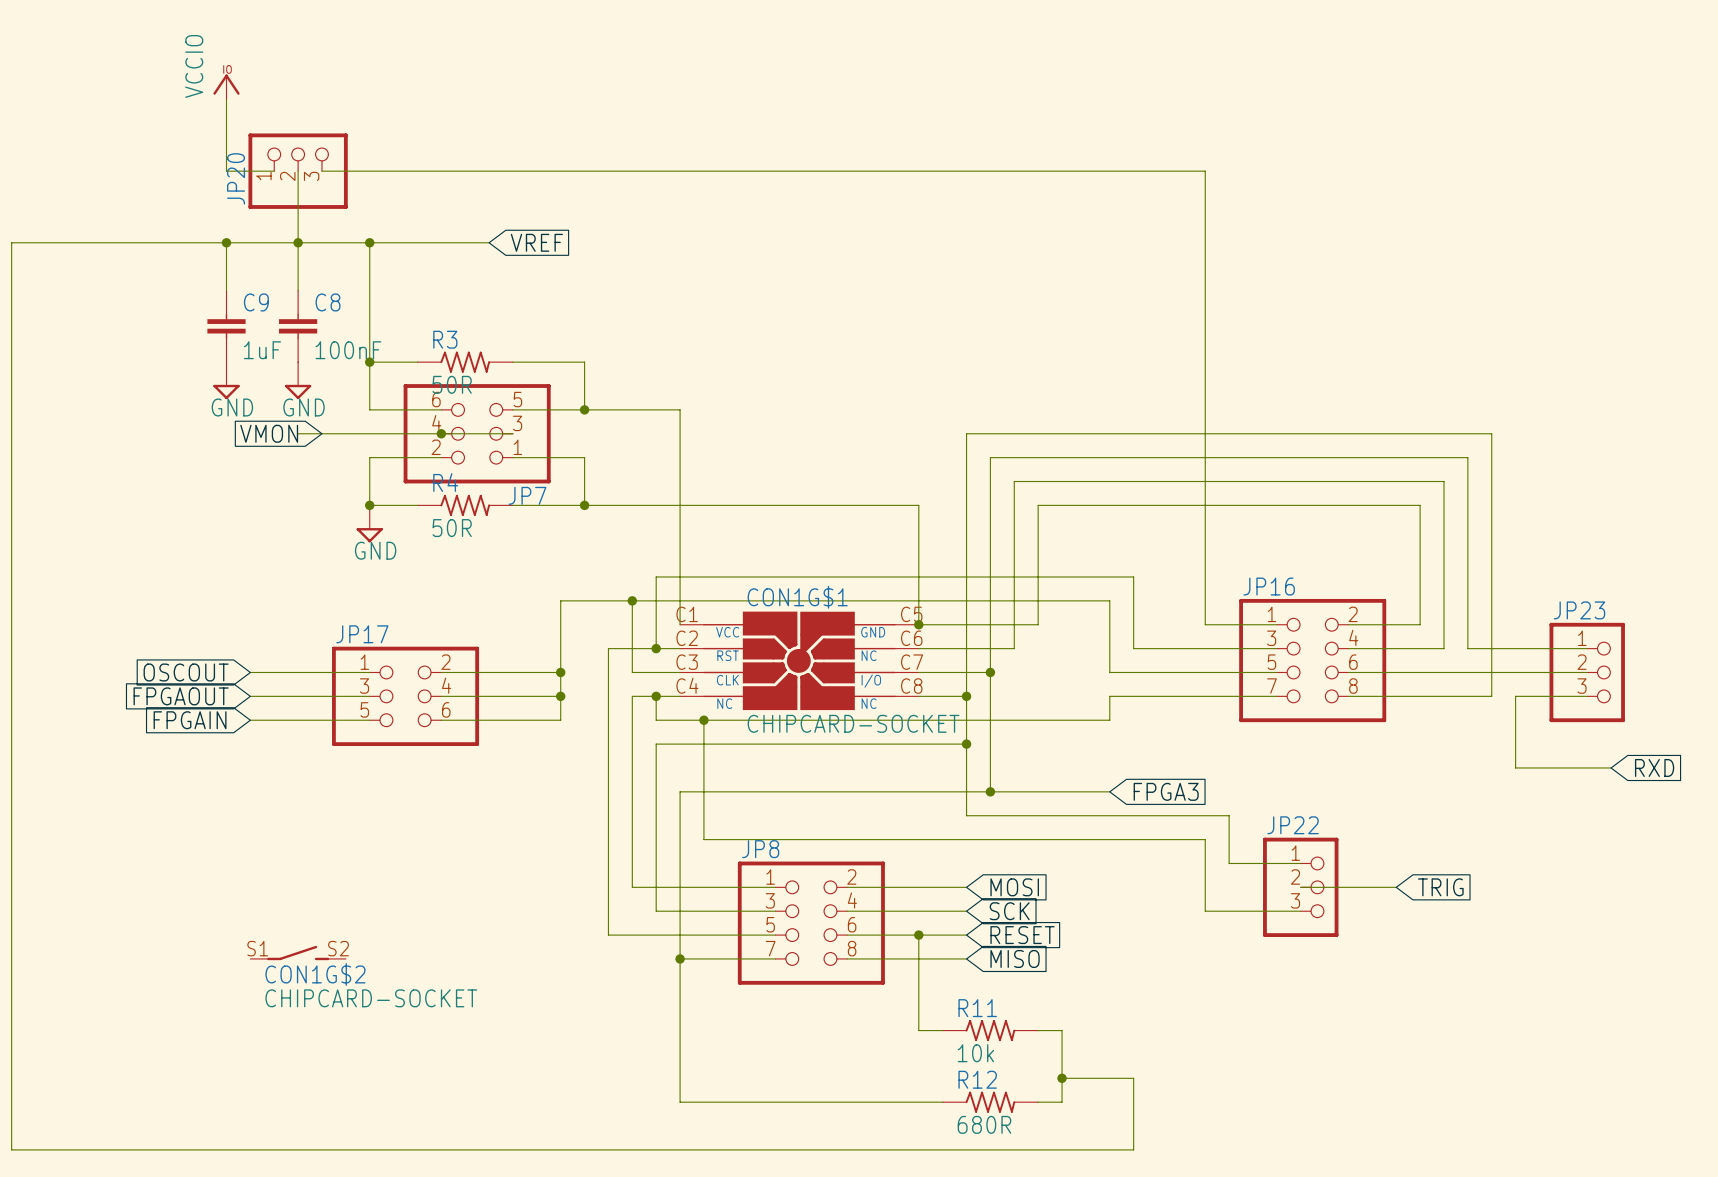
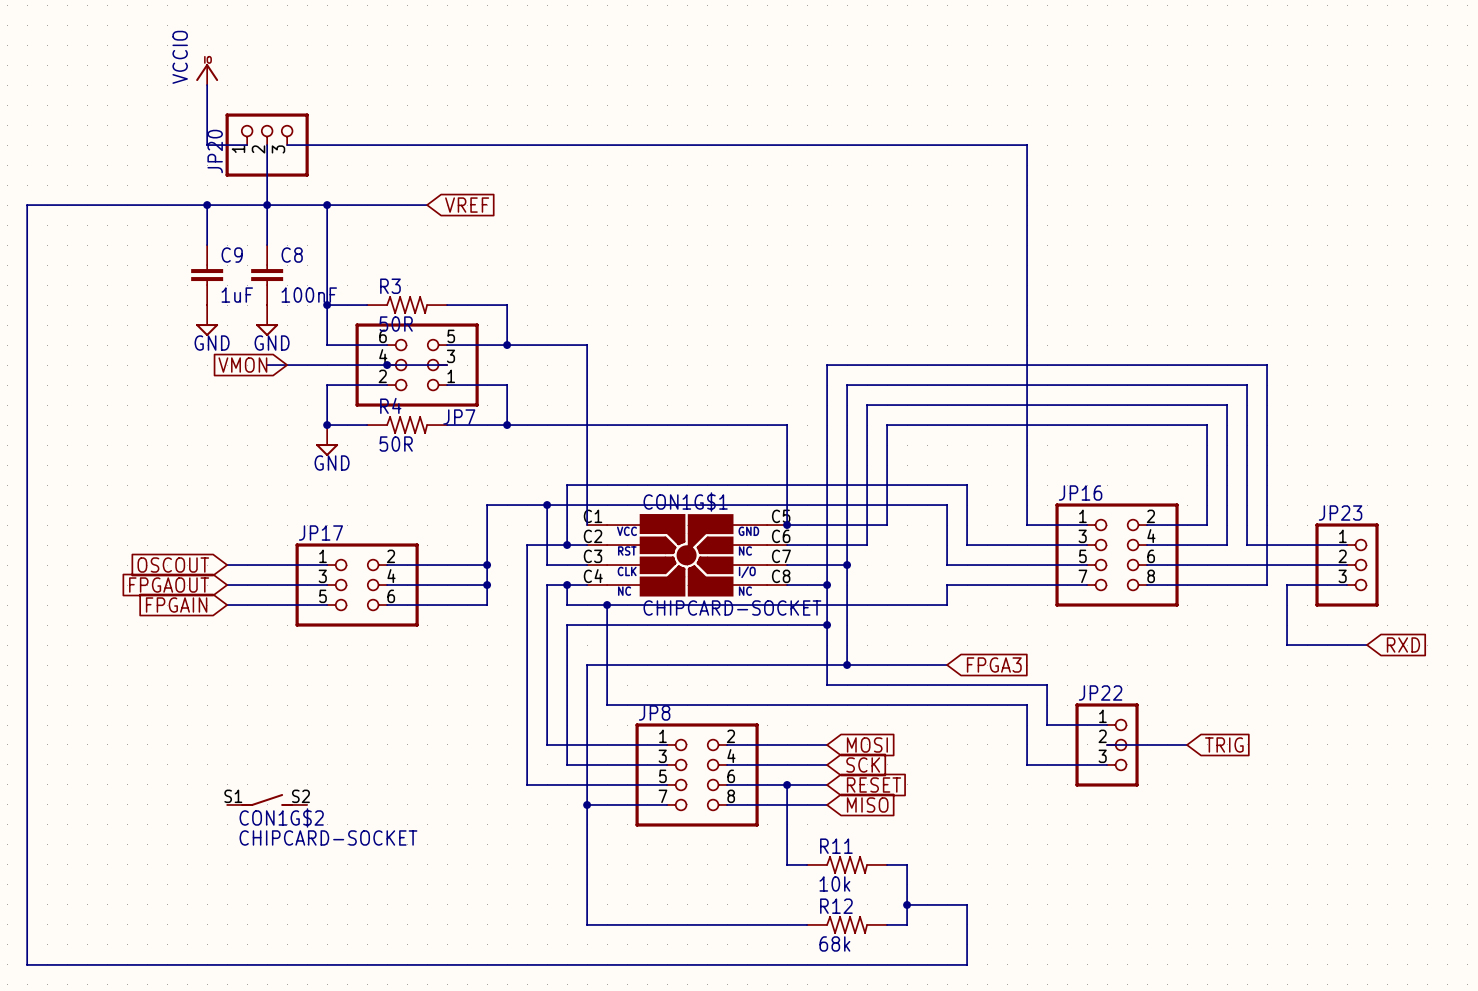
R12 value: 680R (984, 1124) -> 68k (834, 943)

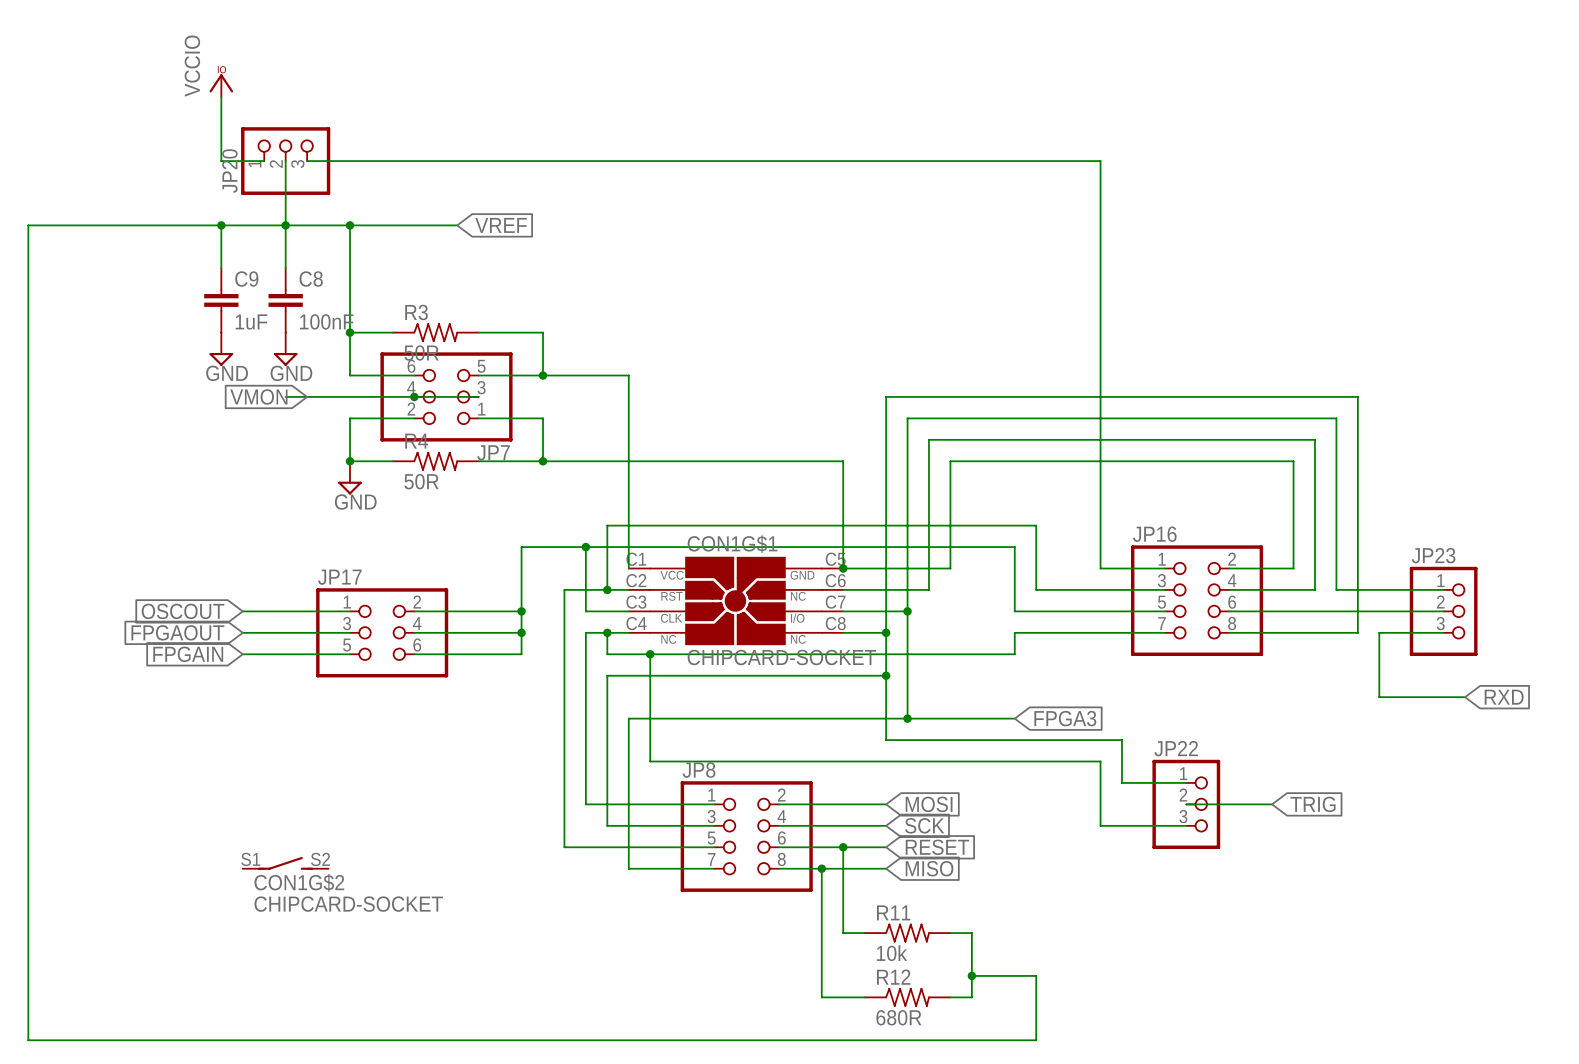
wire: (587, 804) (587, 924) (767, 924) -> (821, 868) (821, 997)
junction: (587, 804) -> none
junction: none -> (821, 868)
R12 value: 68k (834, 943) -> 680R (898, 1017)

